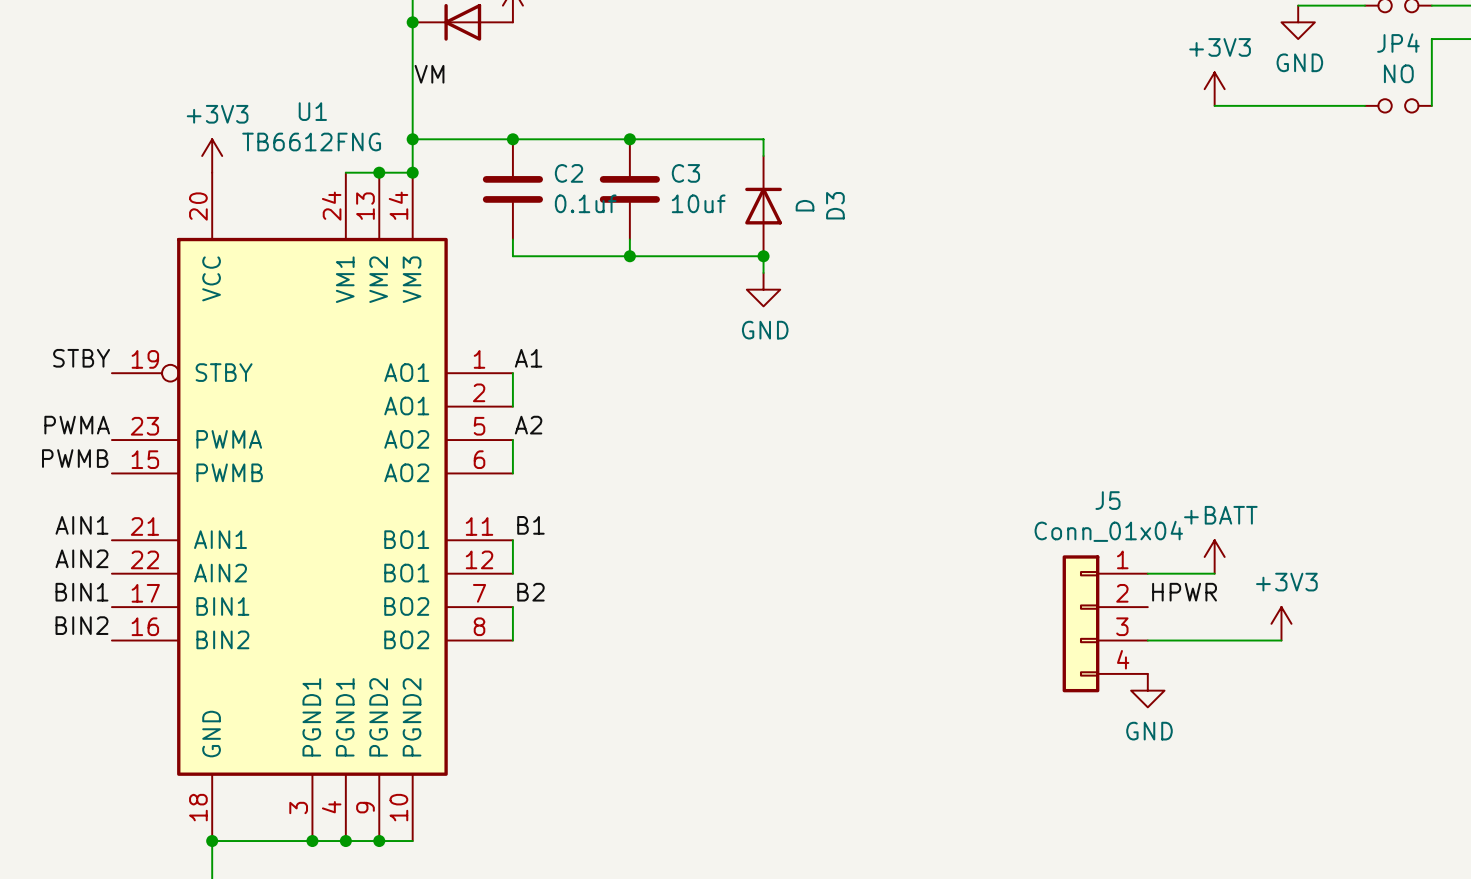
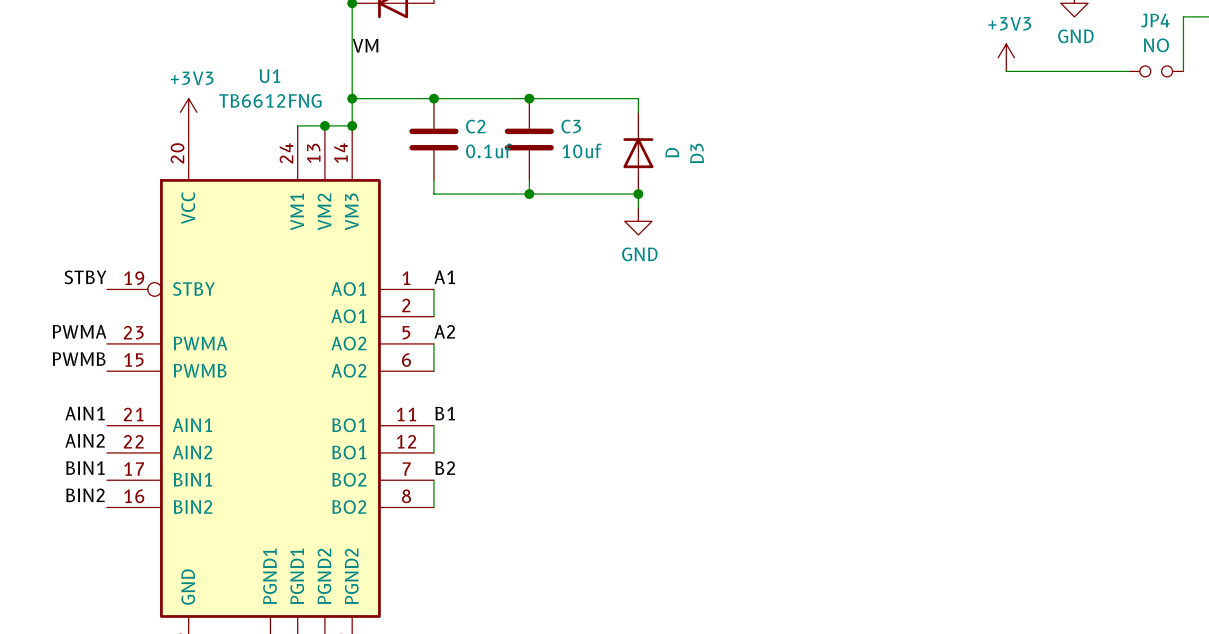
power symbol: +BATT (1214, 556) -> none
wire: (1147, 573) (1214, 573) -> none
label: HPWR (1184, 592) -> none
J5: Conn_01x04 (1105, 623) -> none
power symbol: +3V3 (1281, 623) -> none
wire: (1147, 640) (1281, 640) -> none
power symbol: GND (1147, 690) -> none

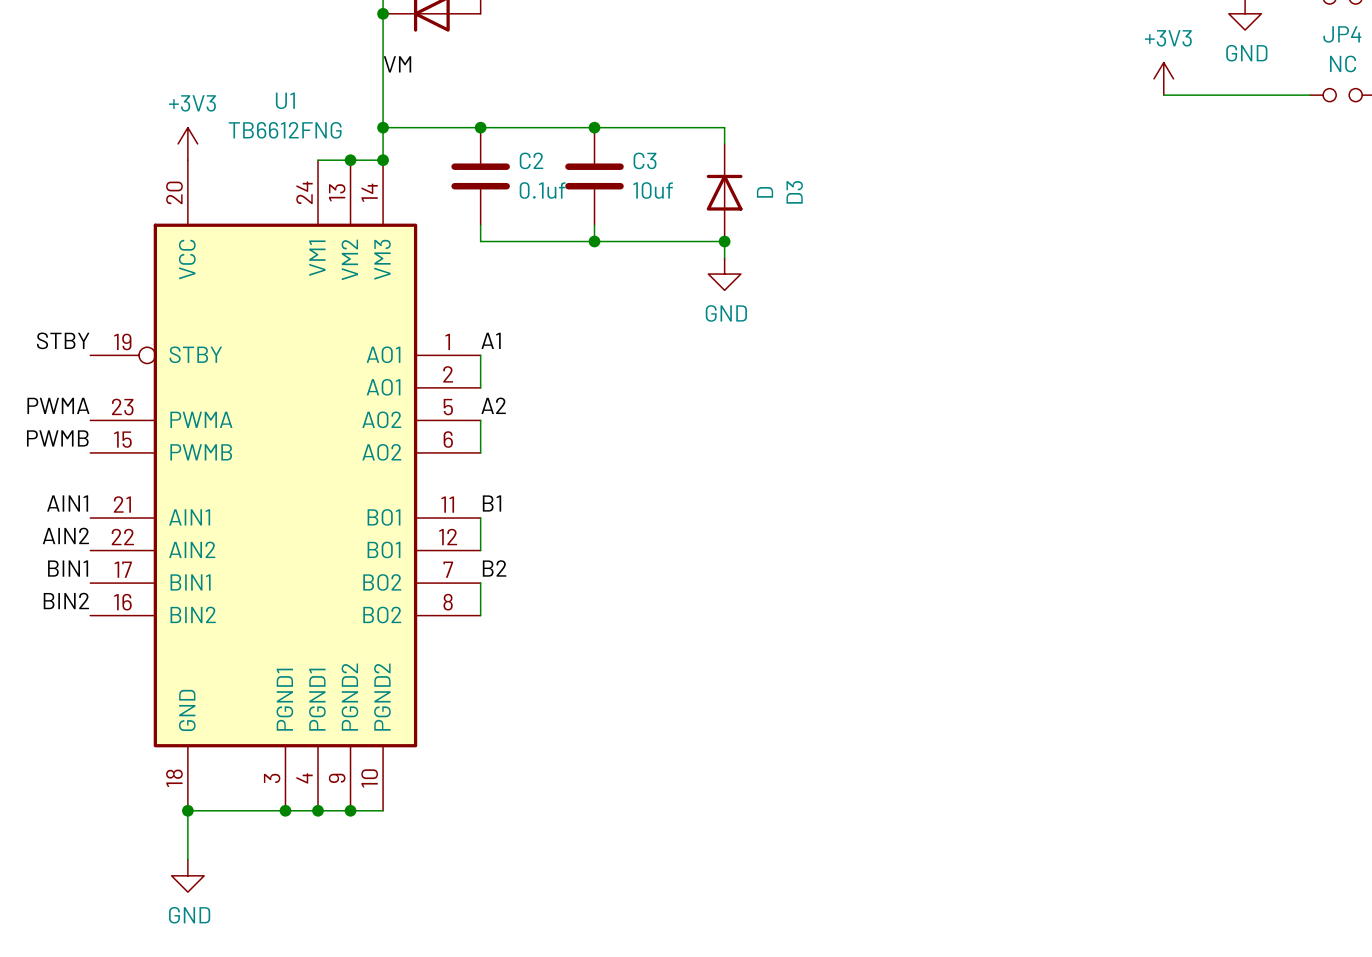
JP4 value: NO (1156, 45) -> NC (1343, 63)

